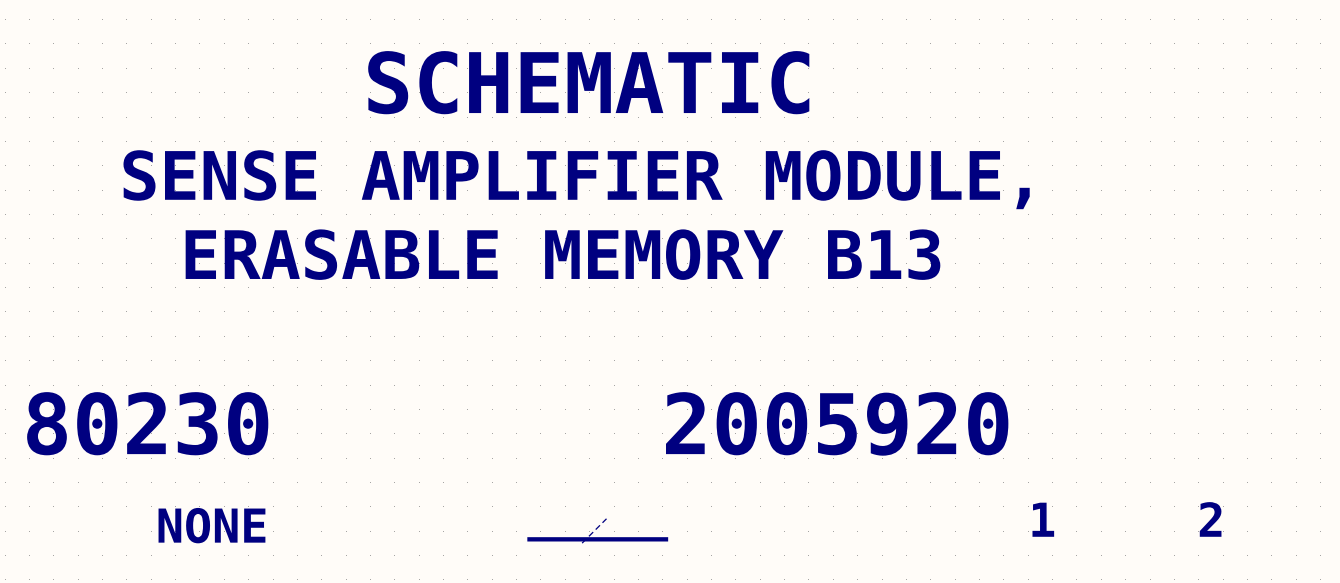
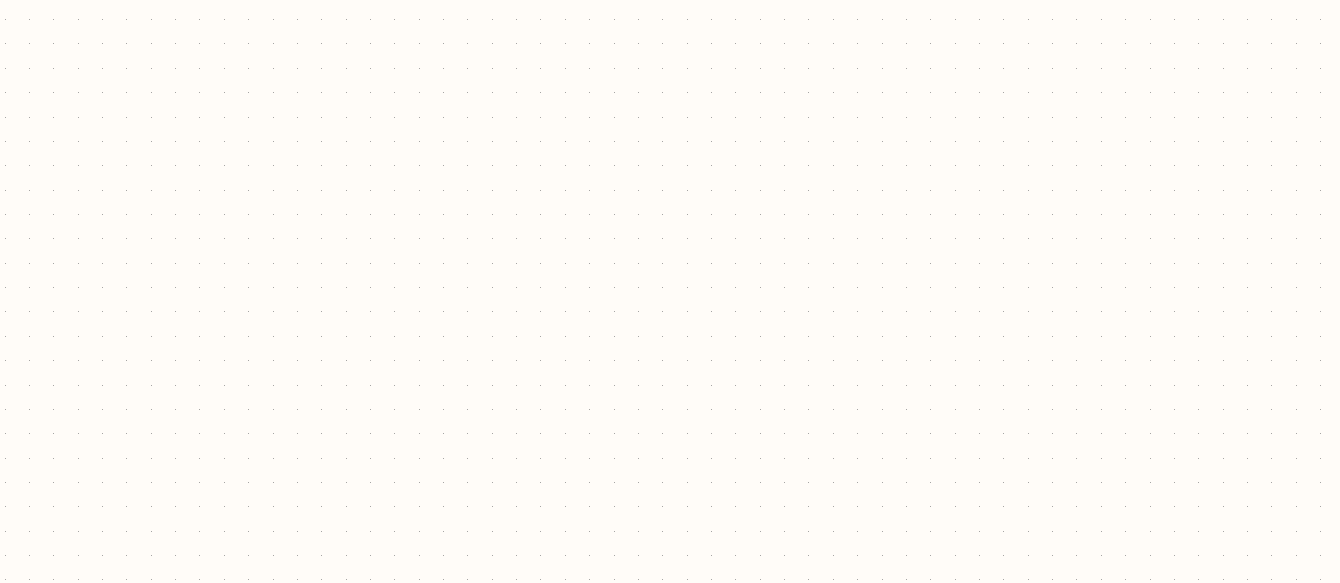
text: SCHEMATIC (588, 82) -> none
text: SENSE AMPLIFIER MODULE, (576, 179) -> none
text: ERASABLE MEMORY B13 (562, 254) -> none
text: 80230 (147, 423) -> none
text: 2005920 (837, 423) -> none
line: (606, 518) (582, 543) -> none
text: 1 2 (1126, 519) -> none
text: NONE (211, 525) -> none
text: _____ (597, 539) -> none

